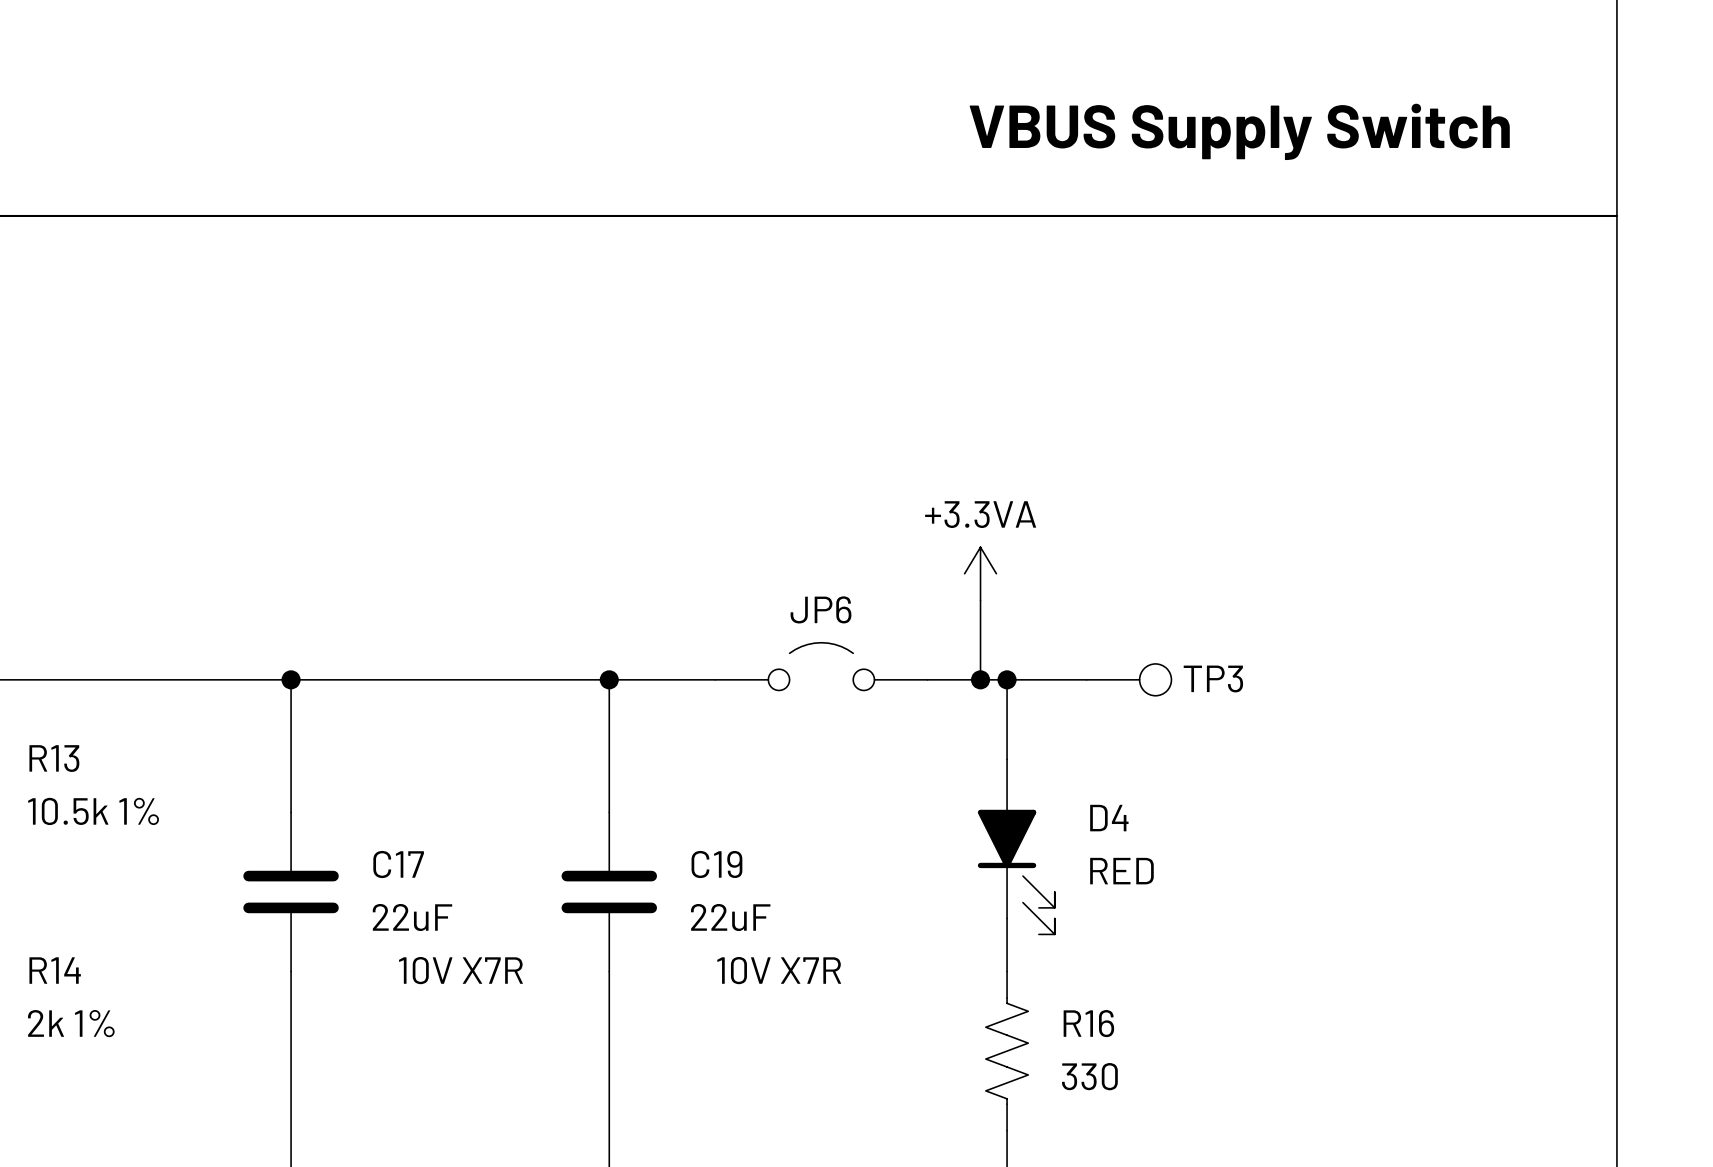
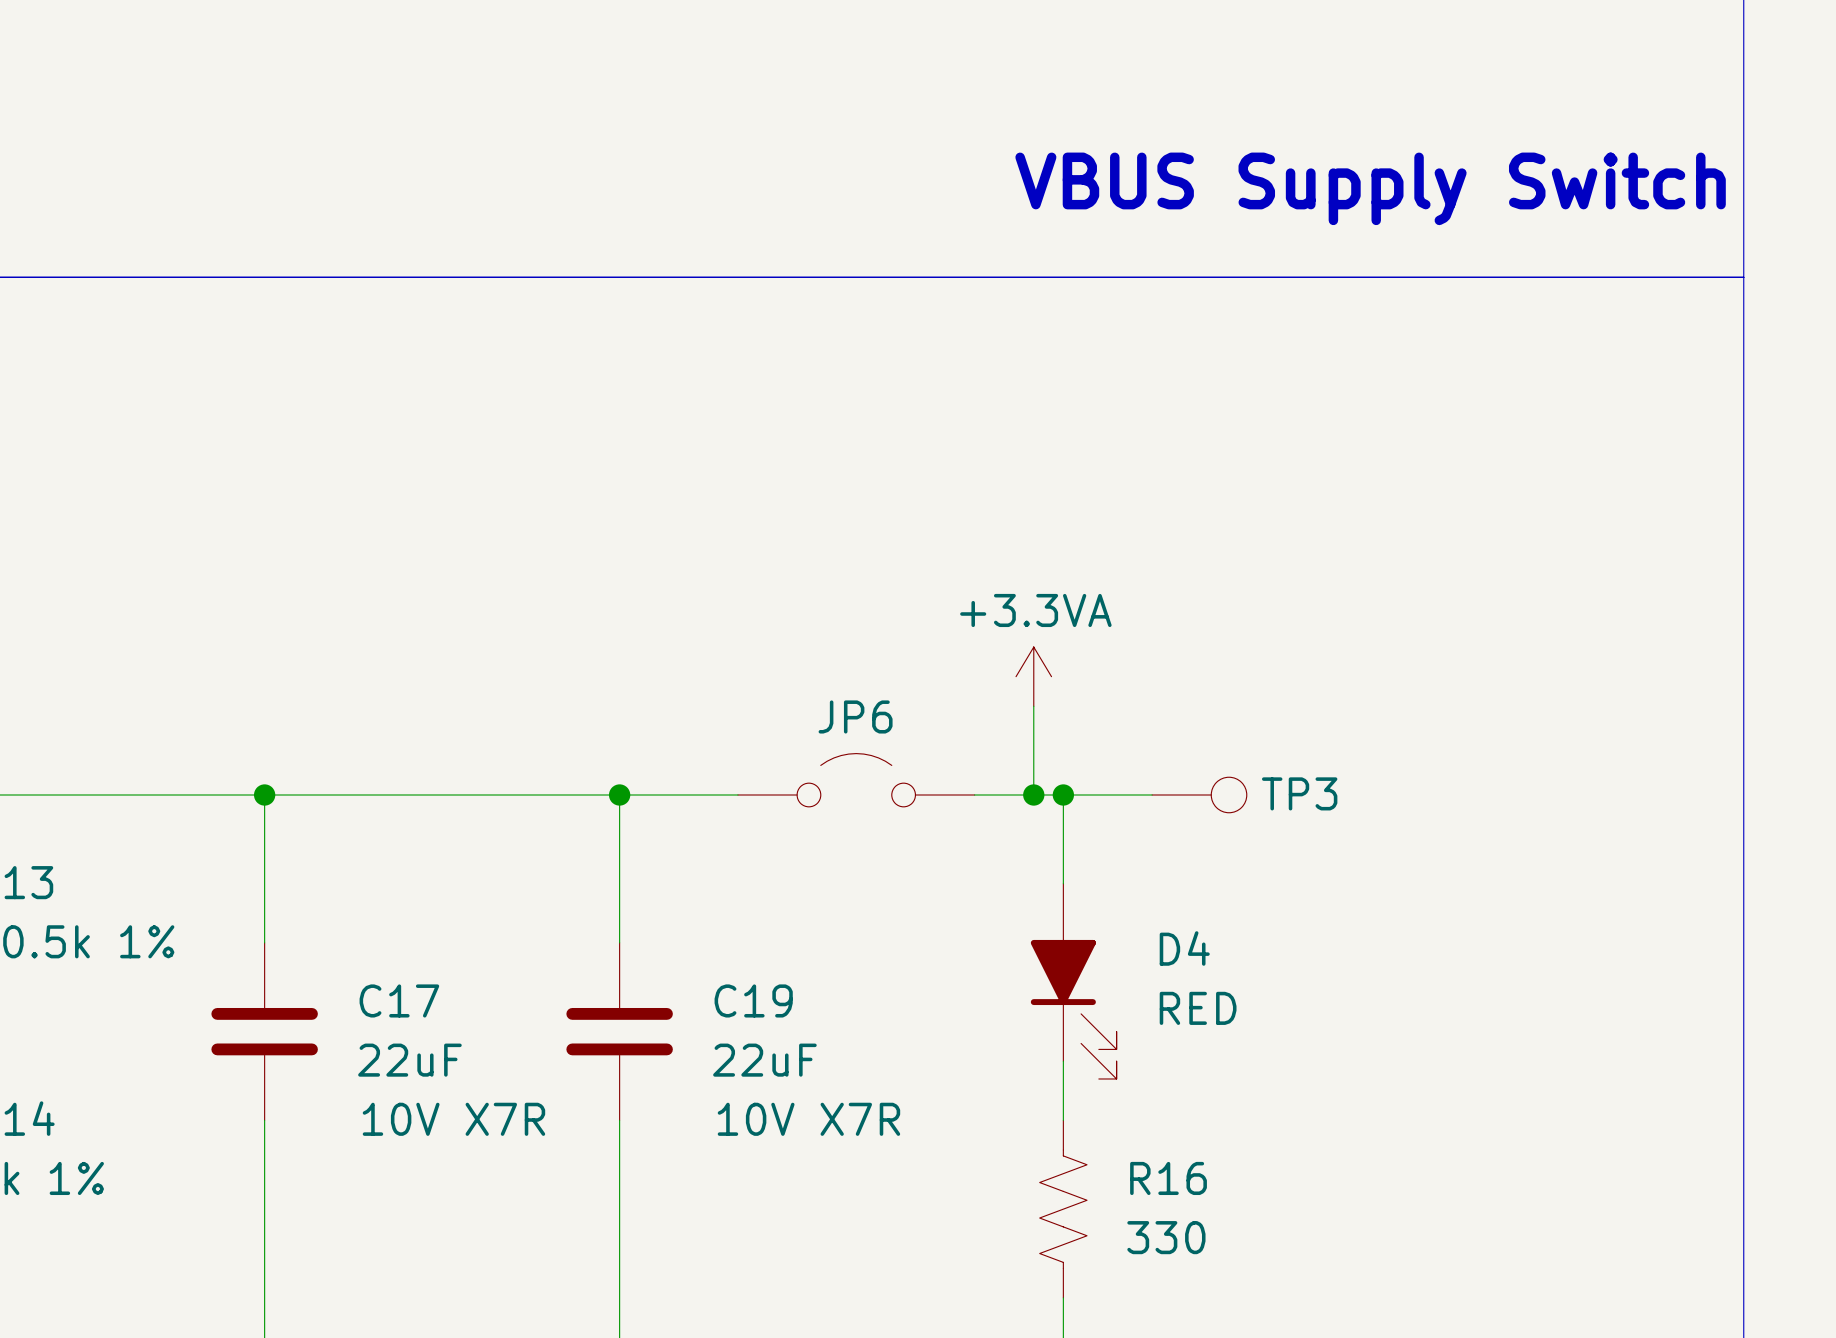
text position: VBUS Supply Switch (1239, 131) -> VBUS Supply Switch (1370, 188)

